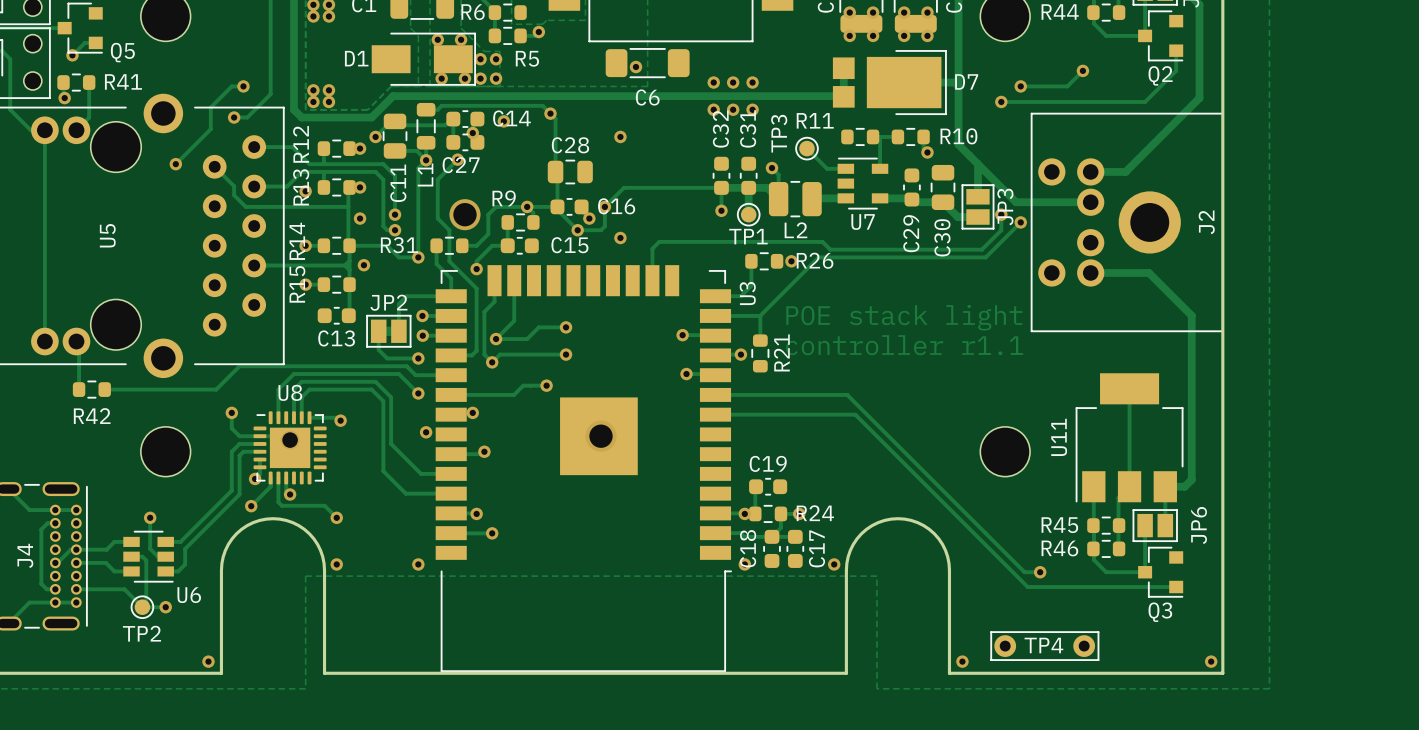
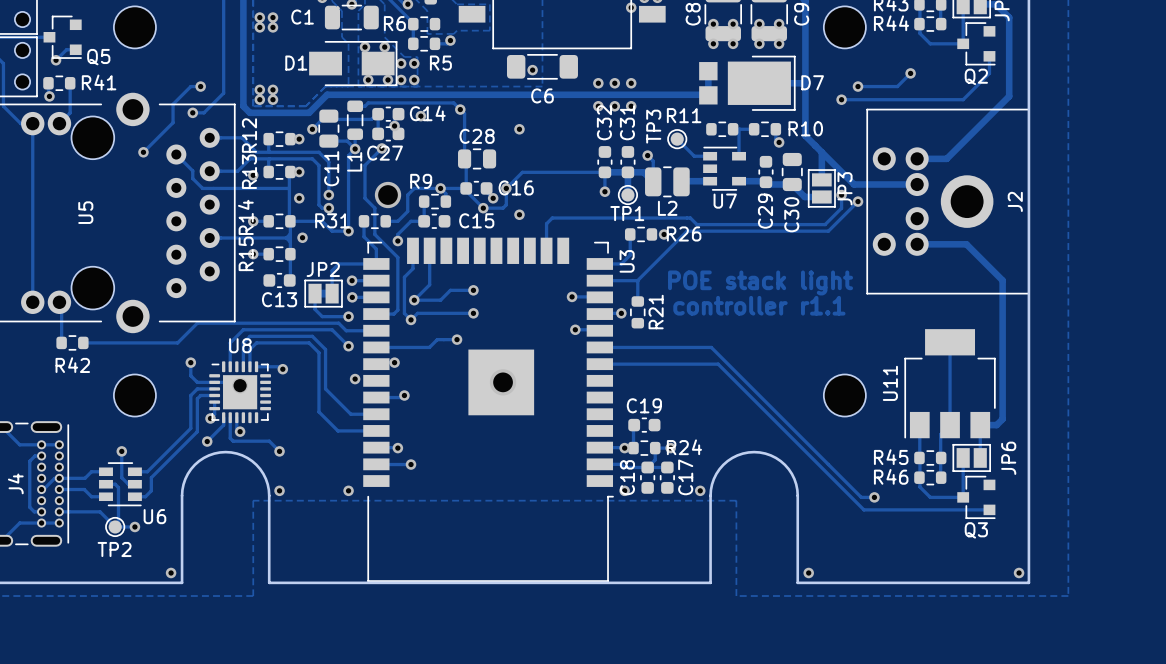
TP4: (1044, 646) -> none

